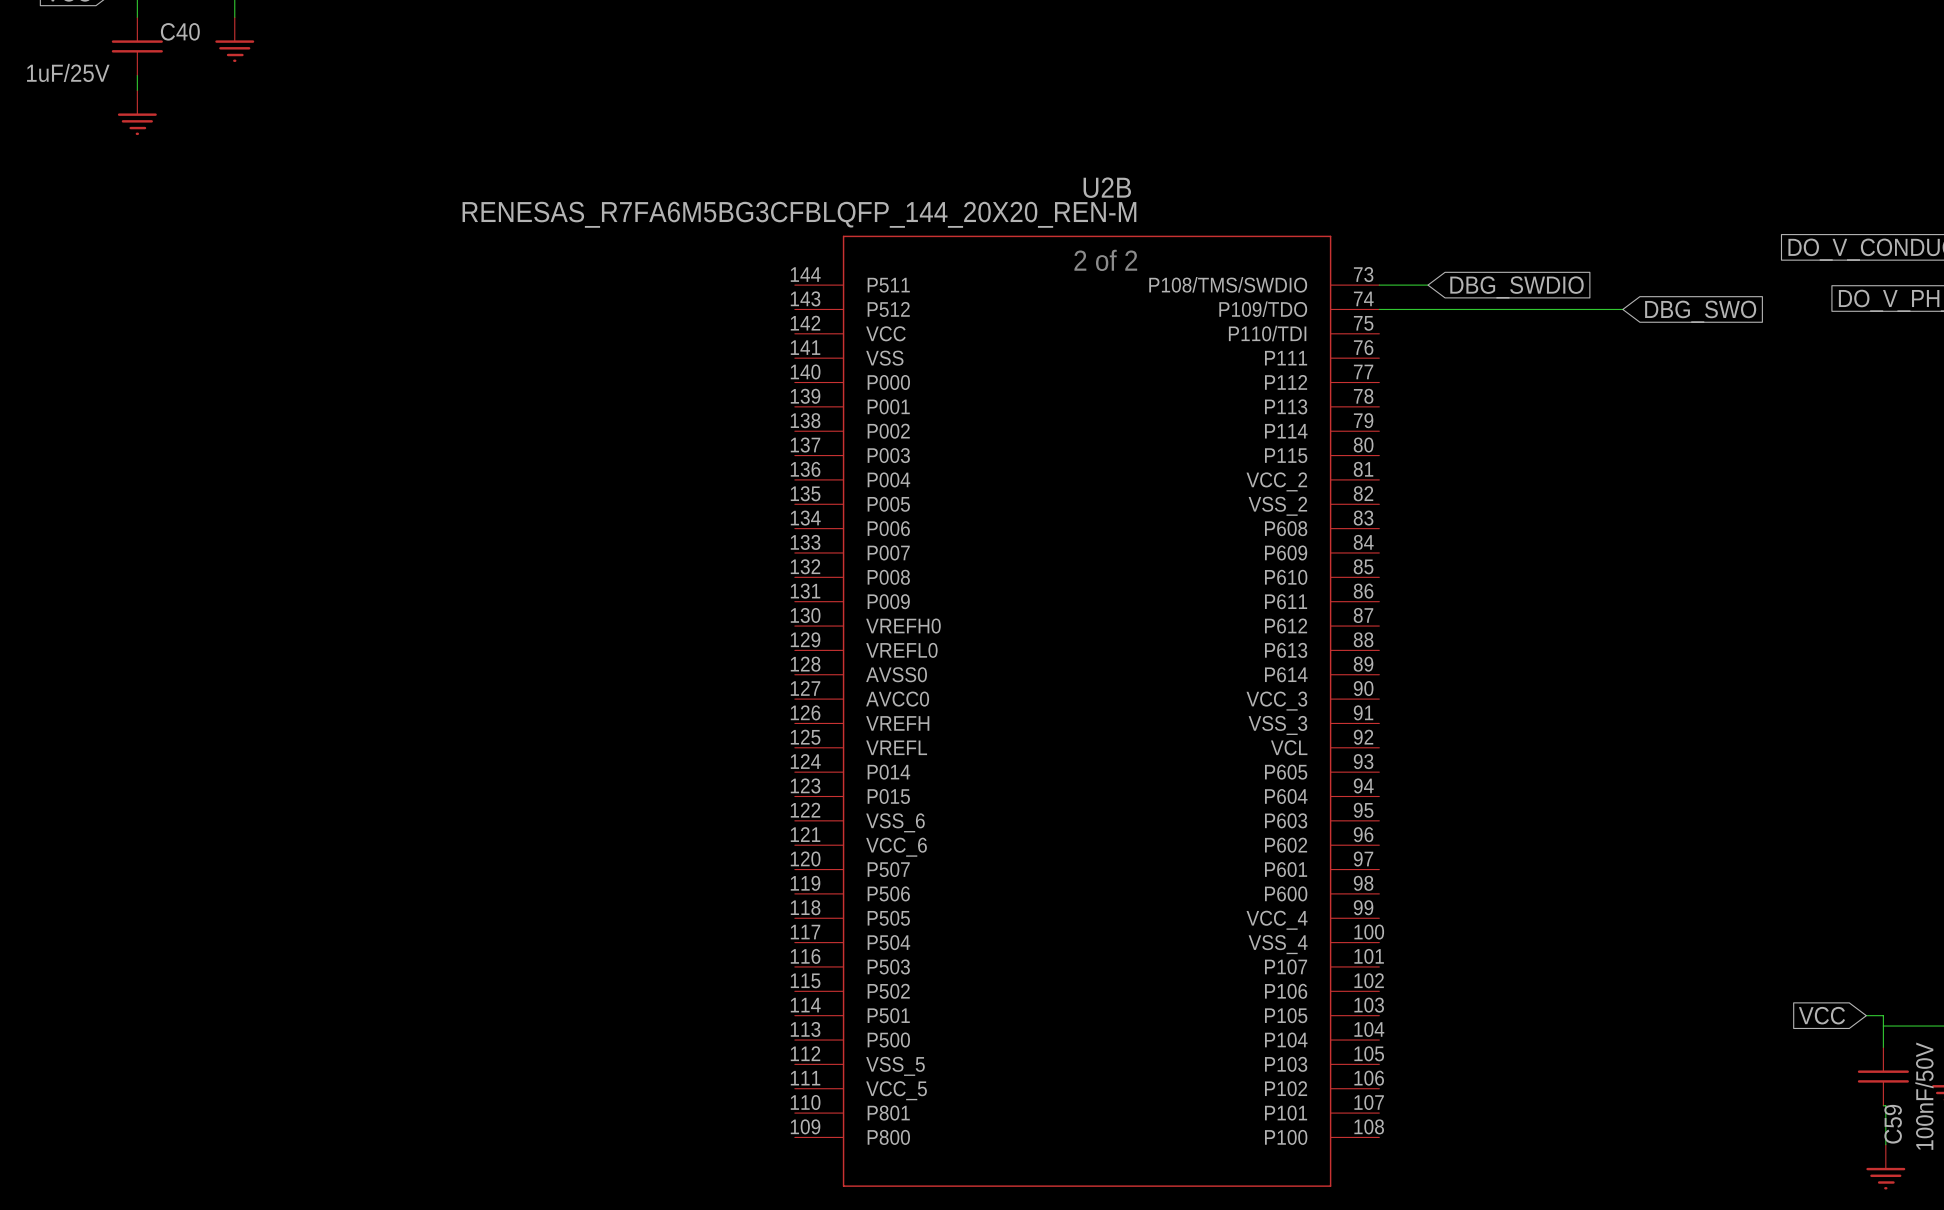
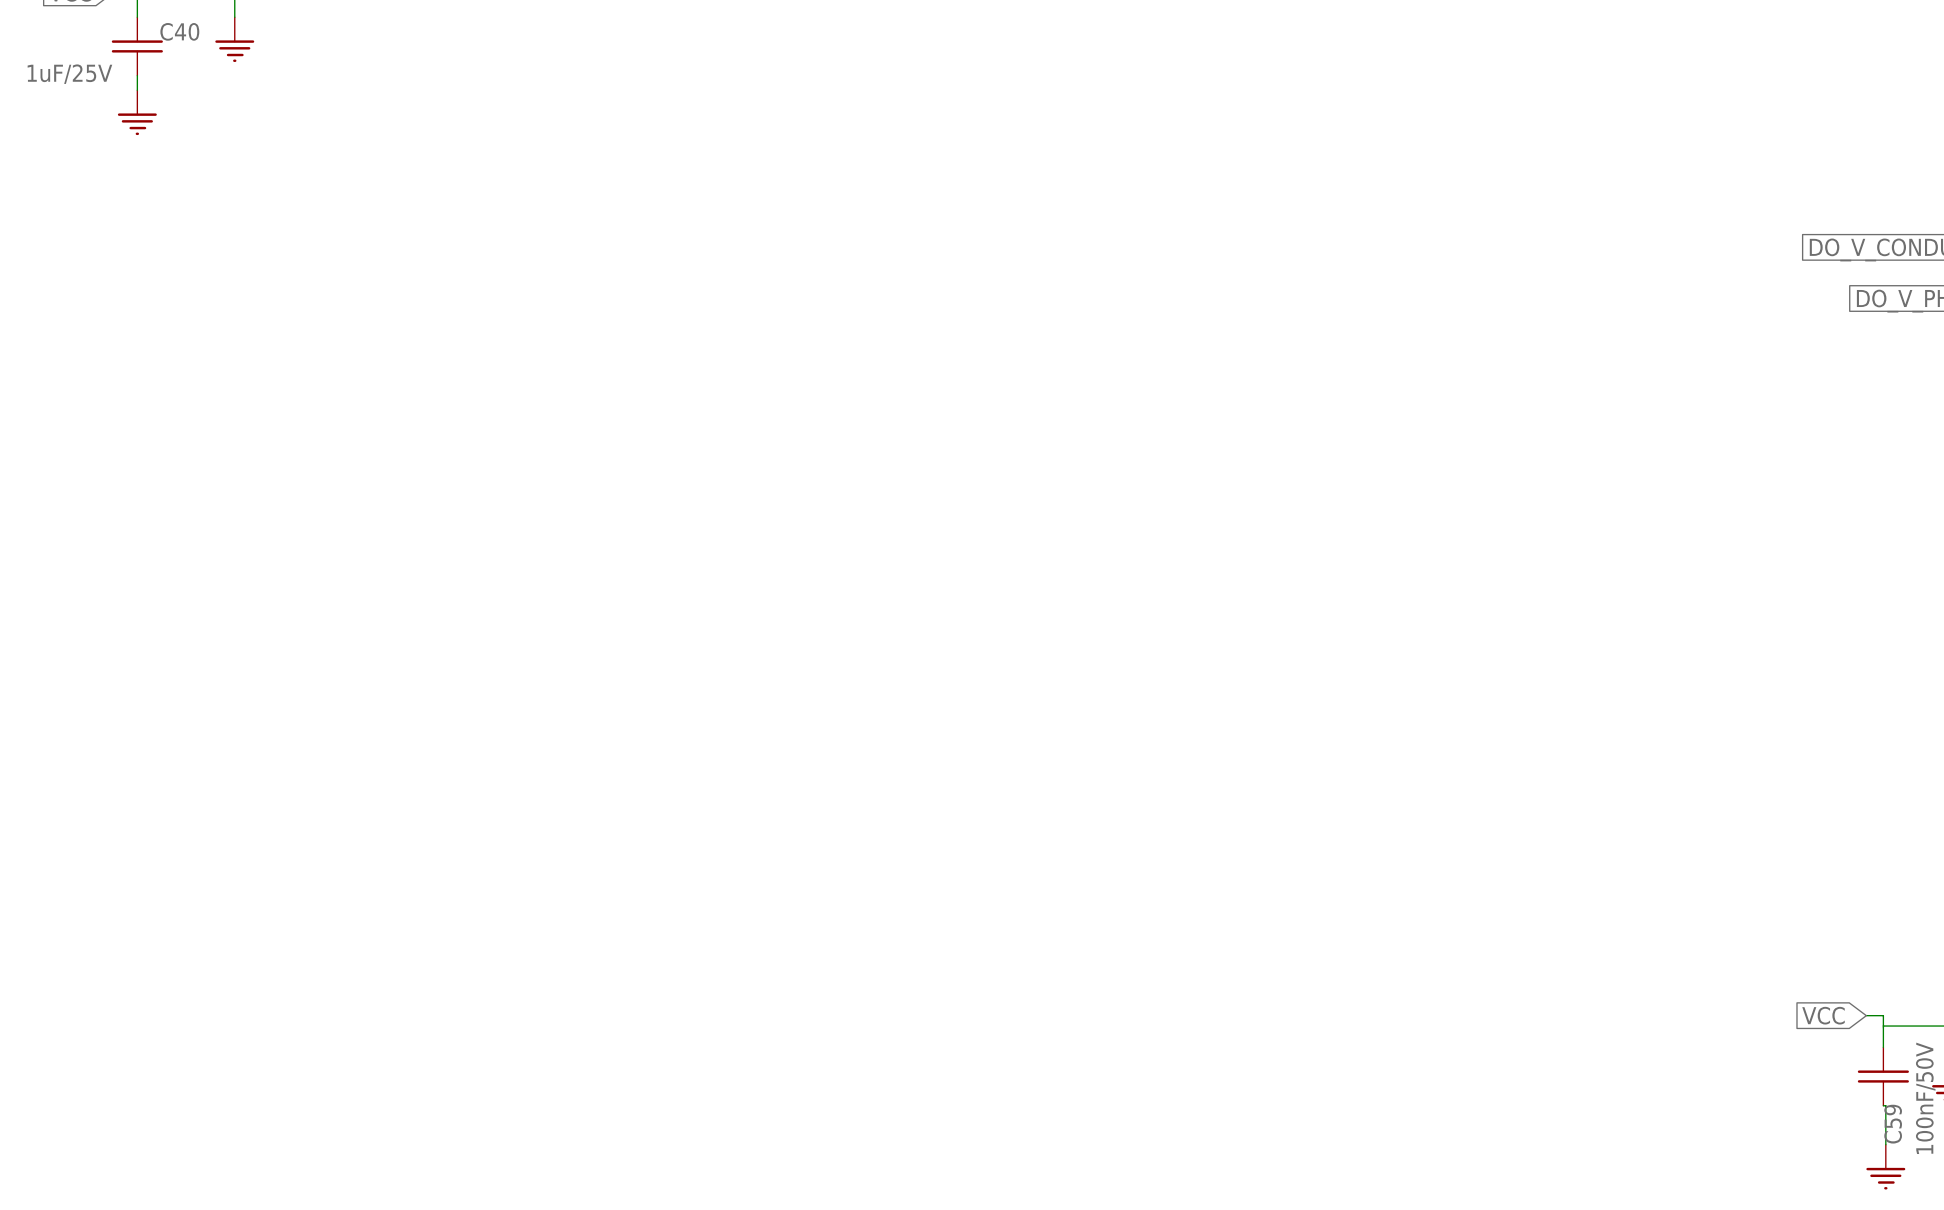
wire: (1379, 285) (1428, 285) -> none
global label: DBG_SWDIO (1516, 287) -> none
wire: (1379, 309) (1622, 309) -> none
global label: DBG_SWO (1700, 311) -> none
U2B: RENESAS_R7FA6M5BG3CFBLQFP_144_20X20_REN-M (1087, 711) -> none

